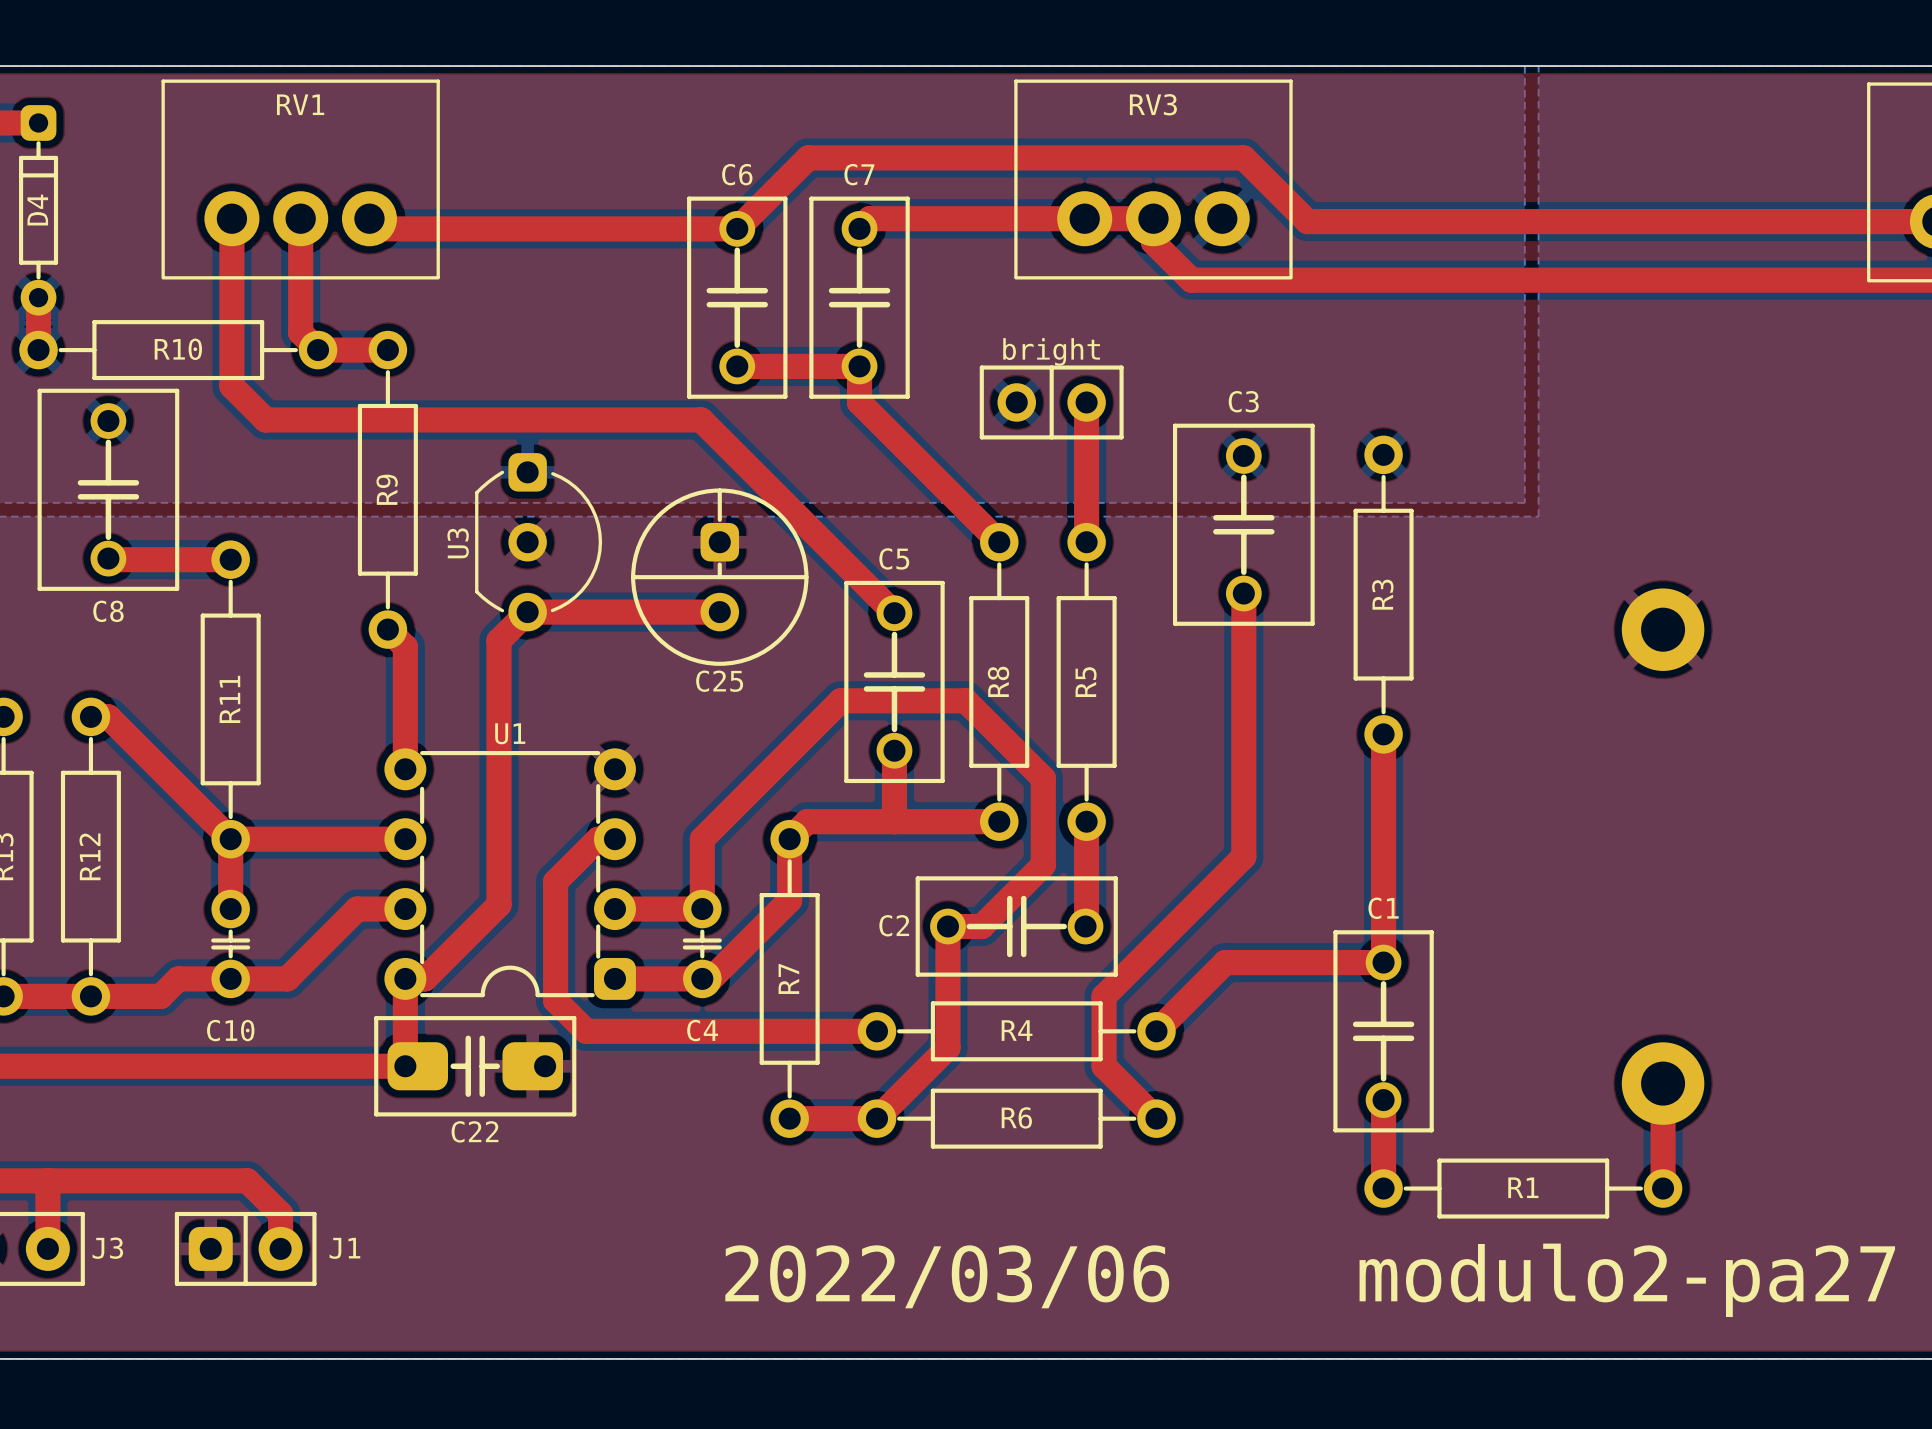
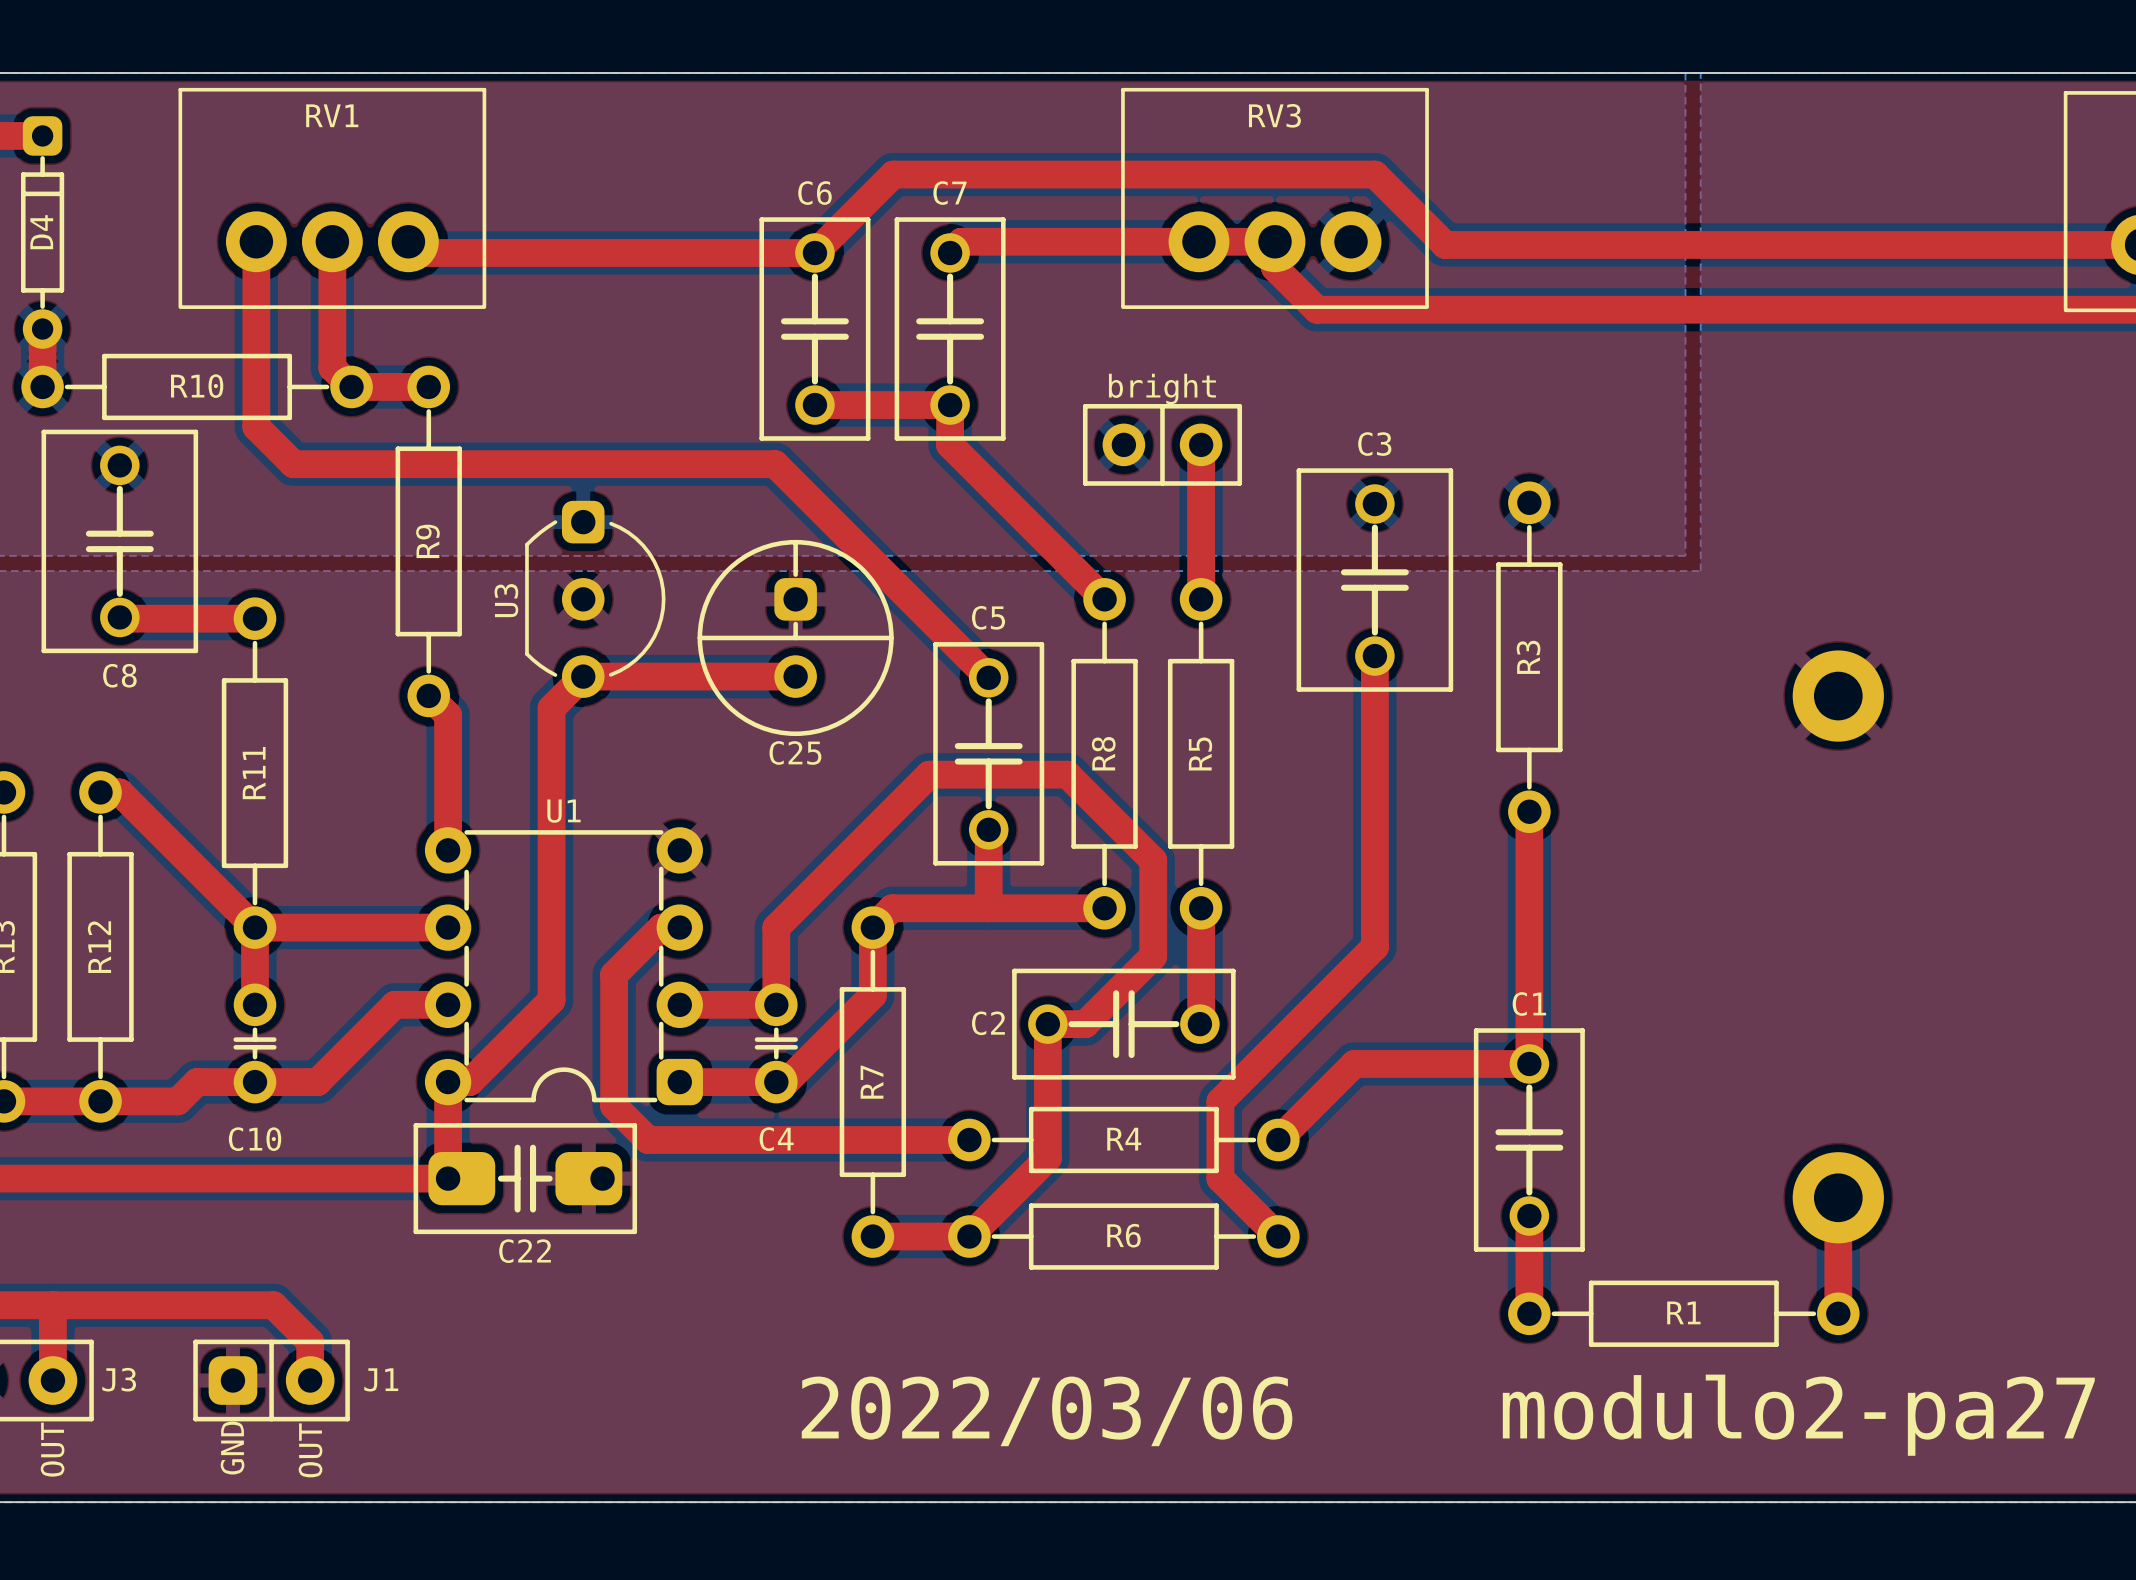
text: none -> GND (232, 1448)
text: none -> OUT (52, 1449)
text: none -> OUT (310, 1450)

